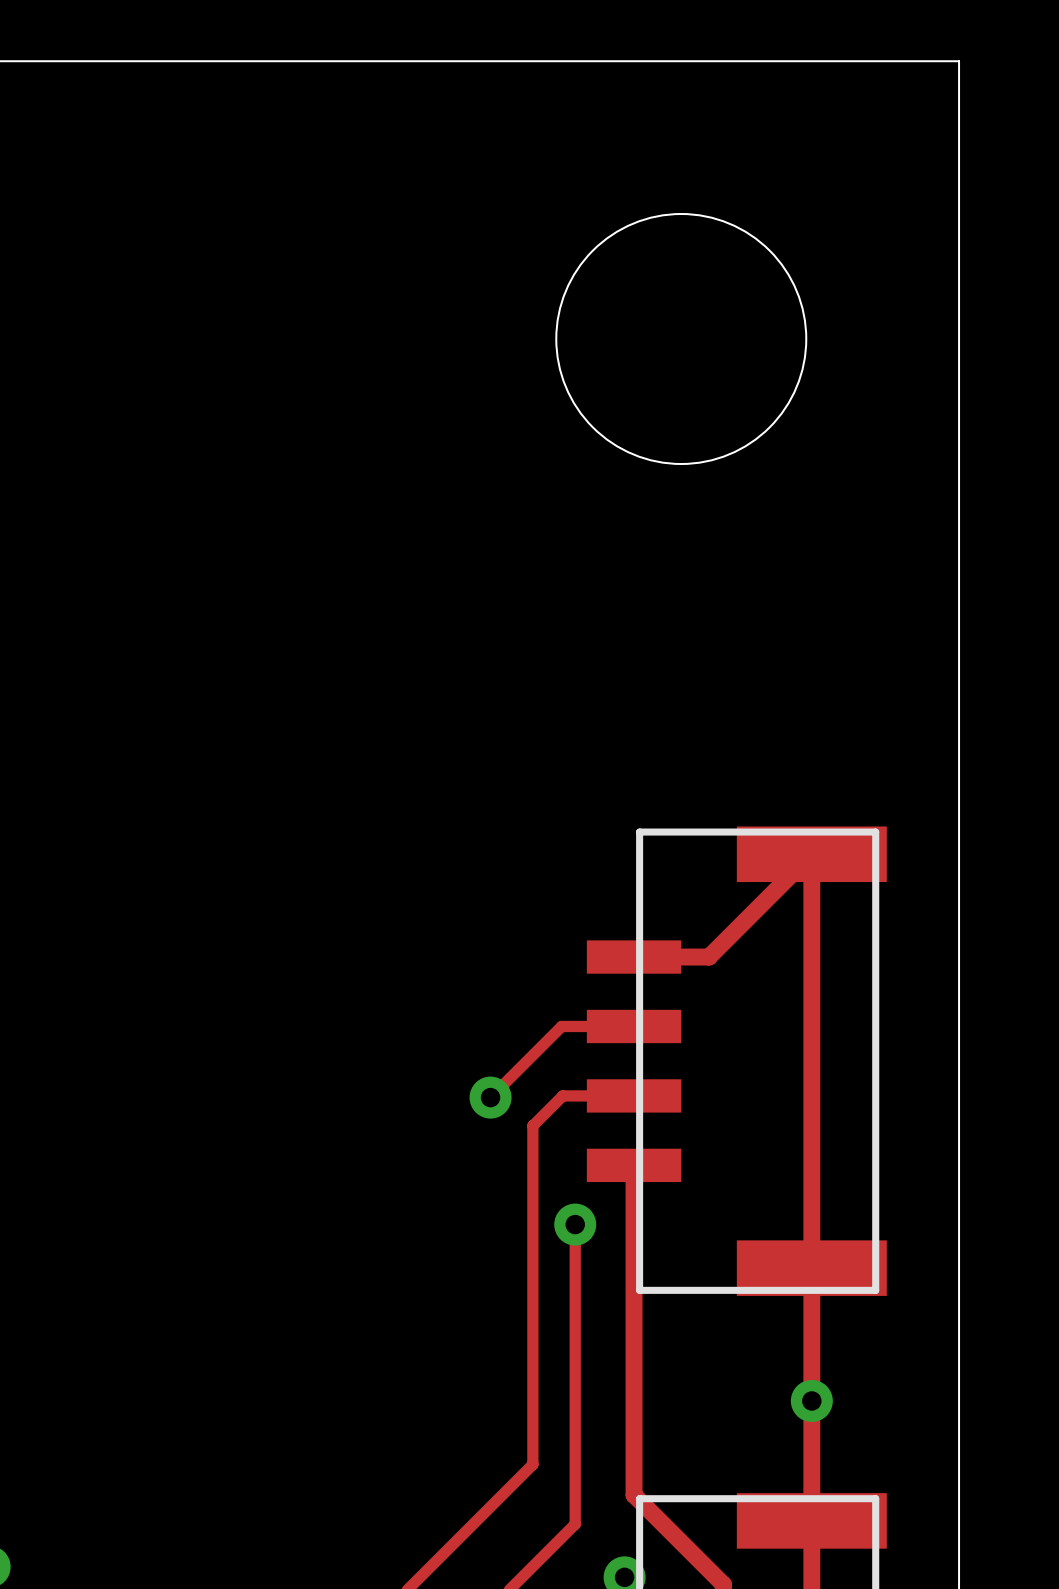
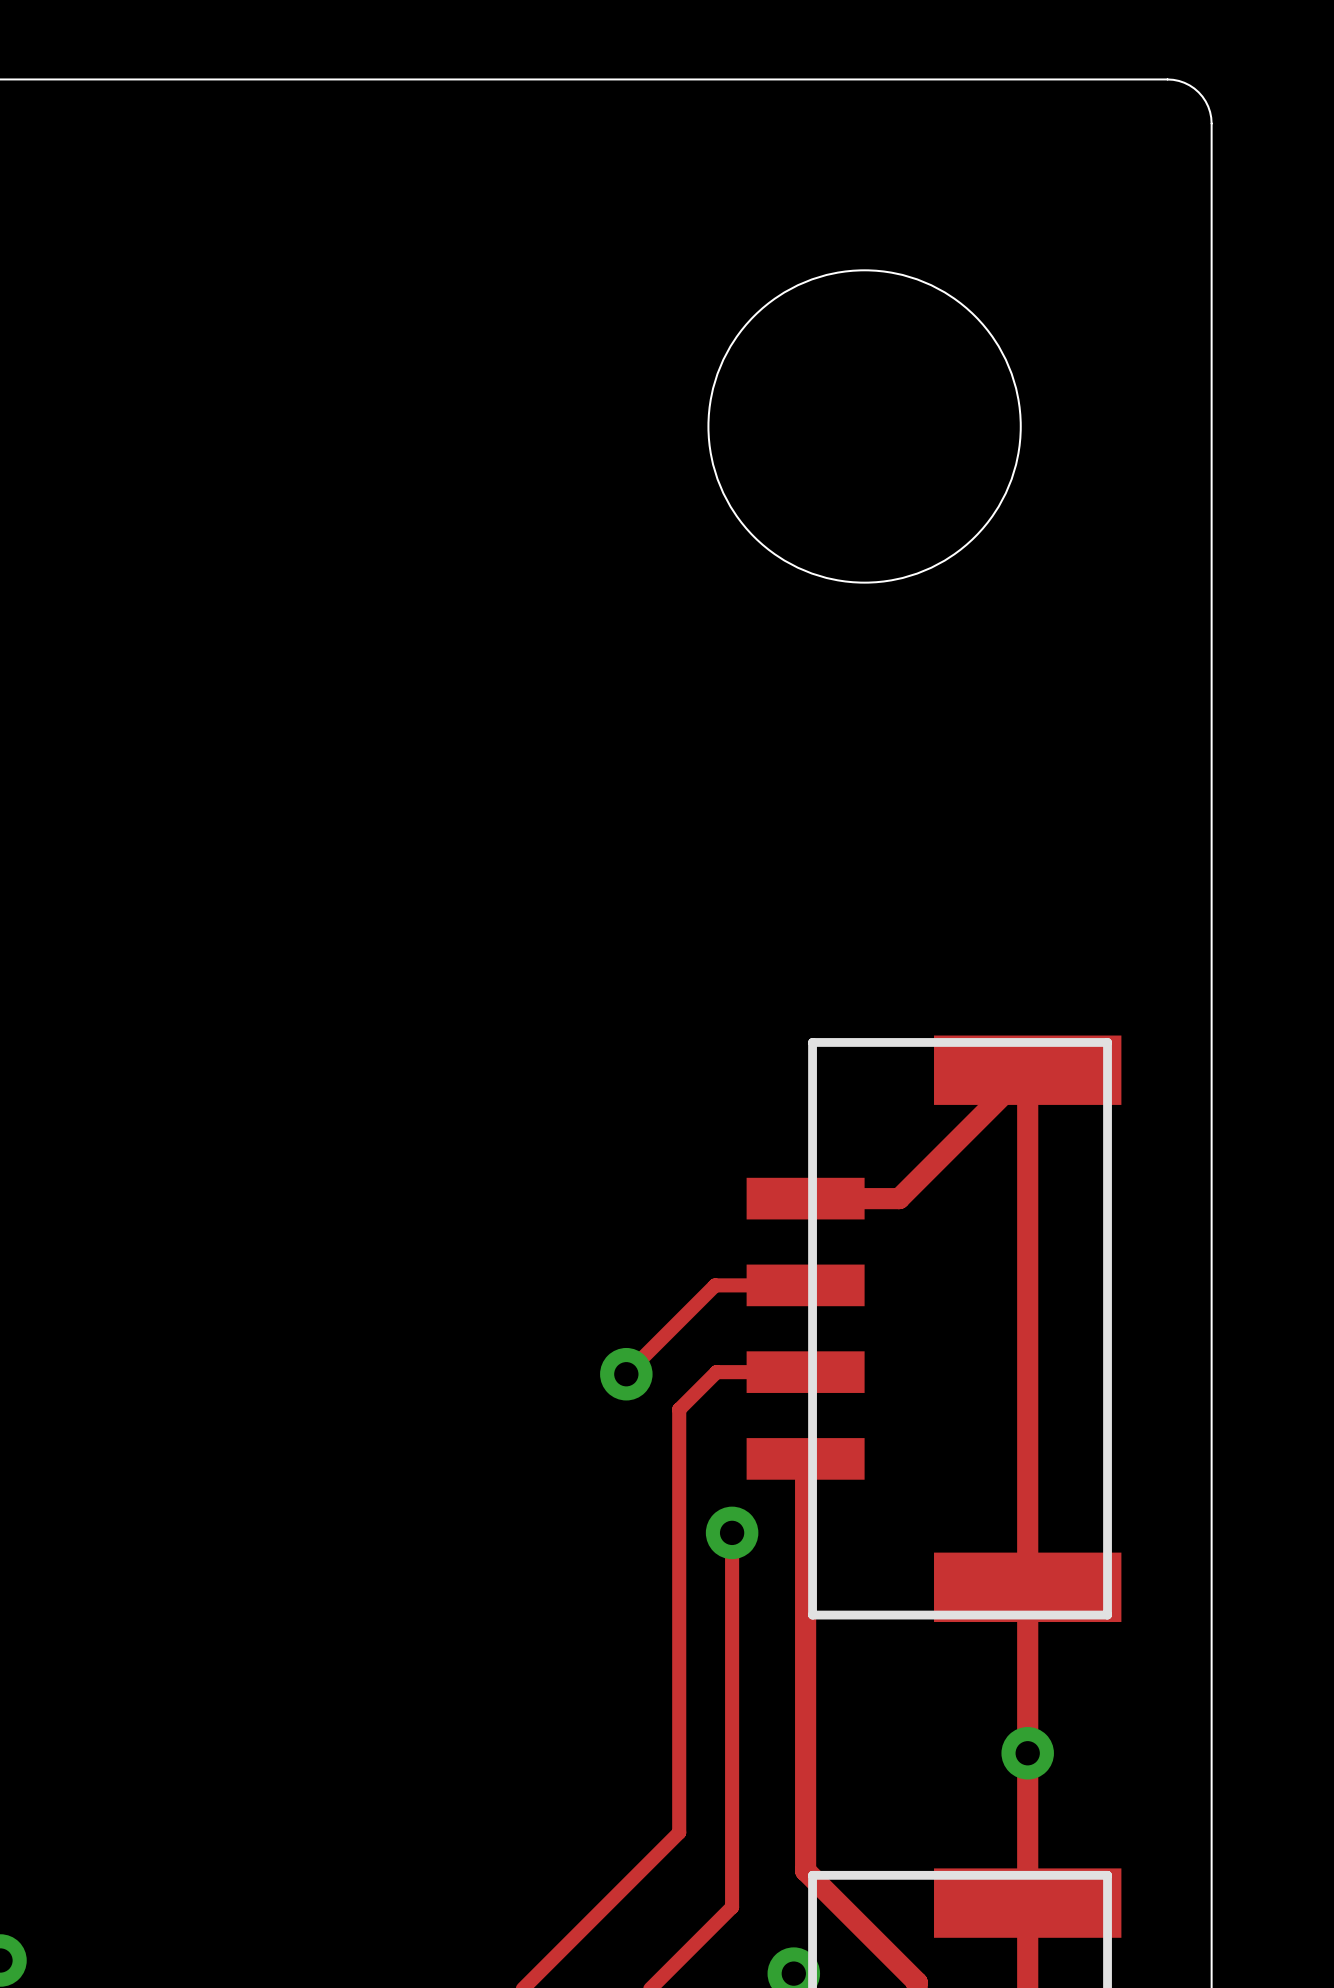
board edge: (923, 61) (959, 61) (959, 96) -> (1167, 79) (1184, 82) (1198, 92) (1208, 106) (1211, 123)

